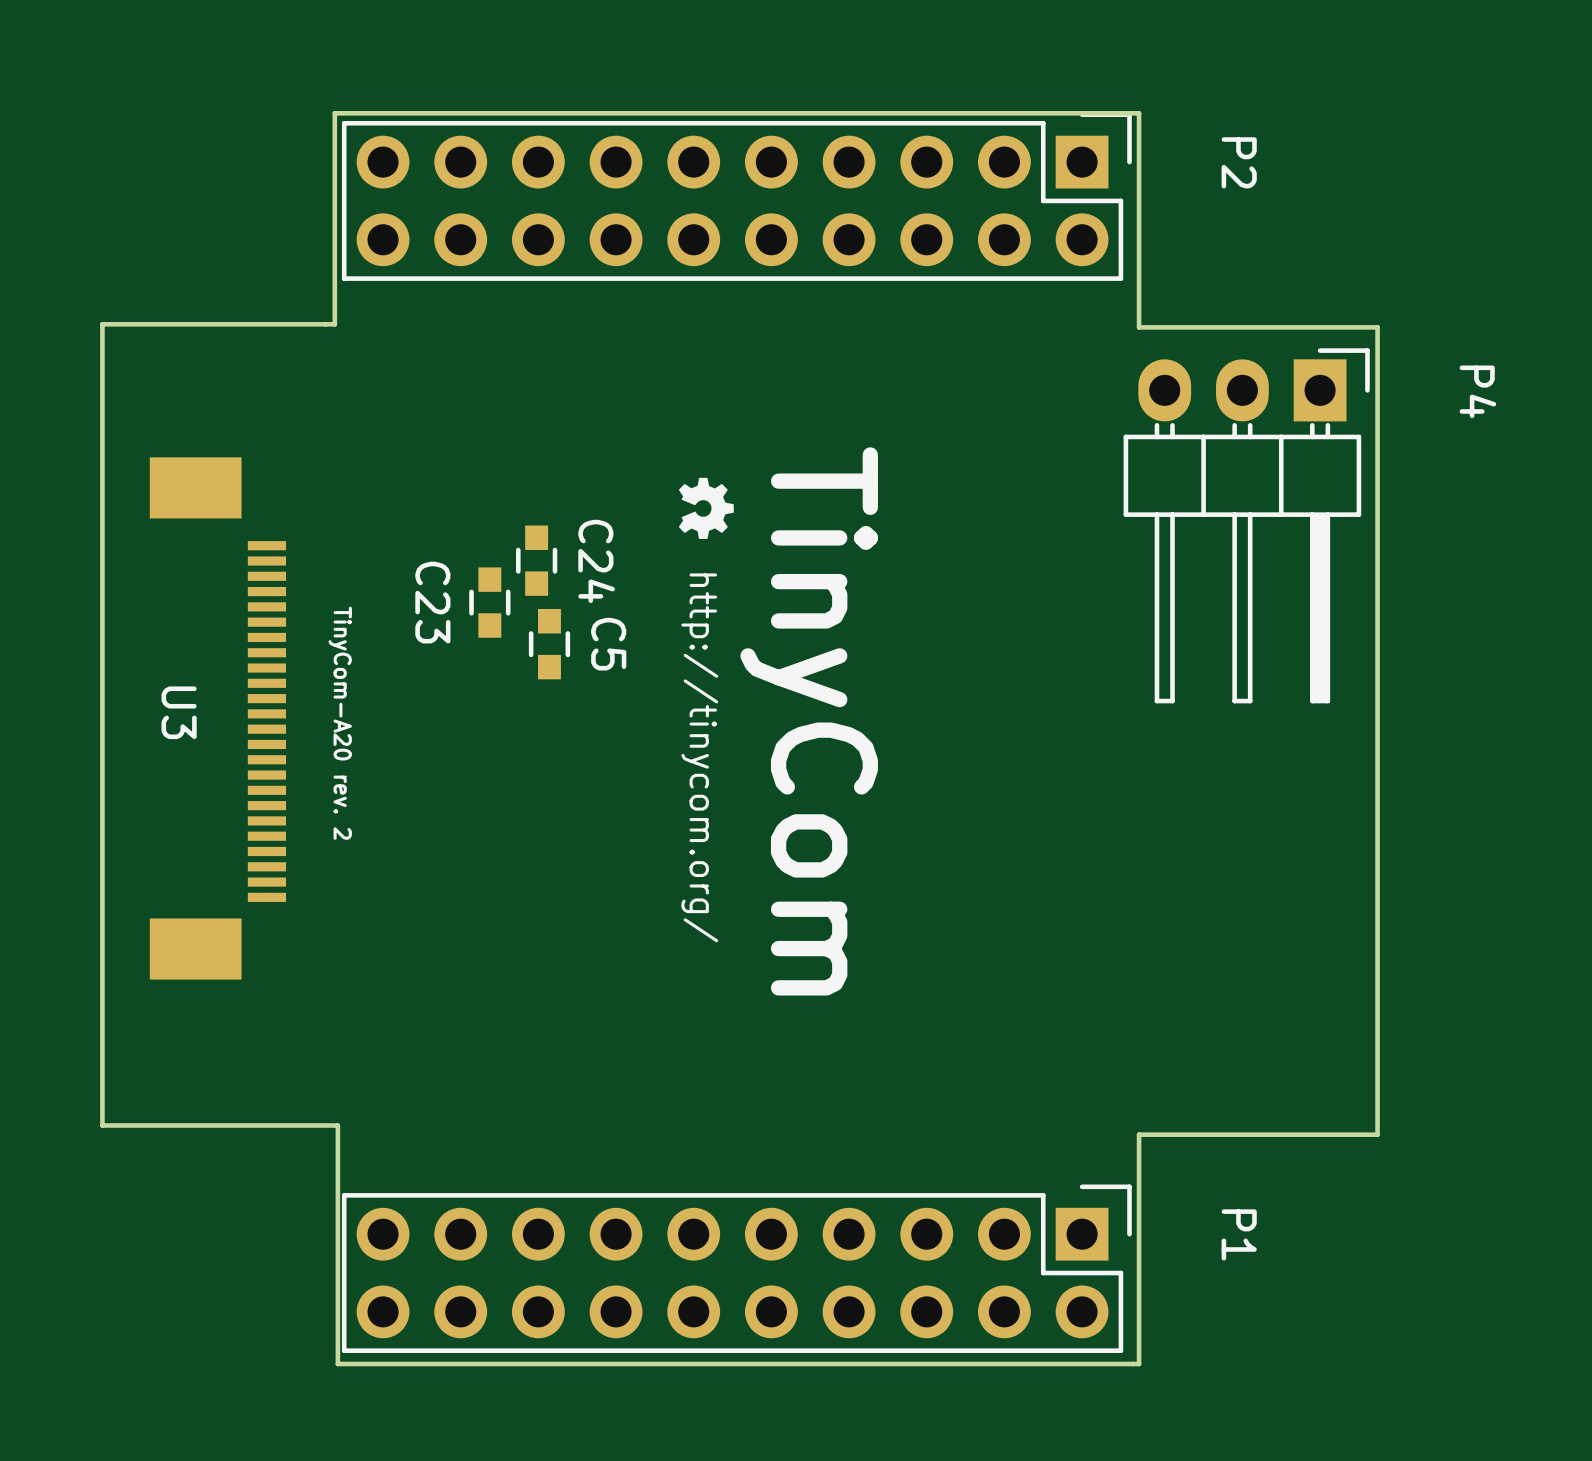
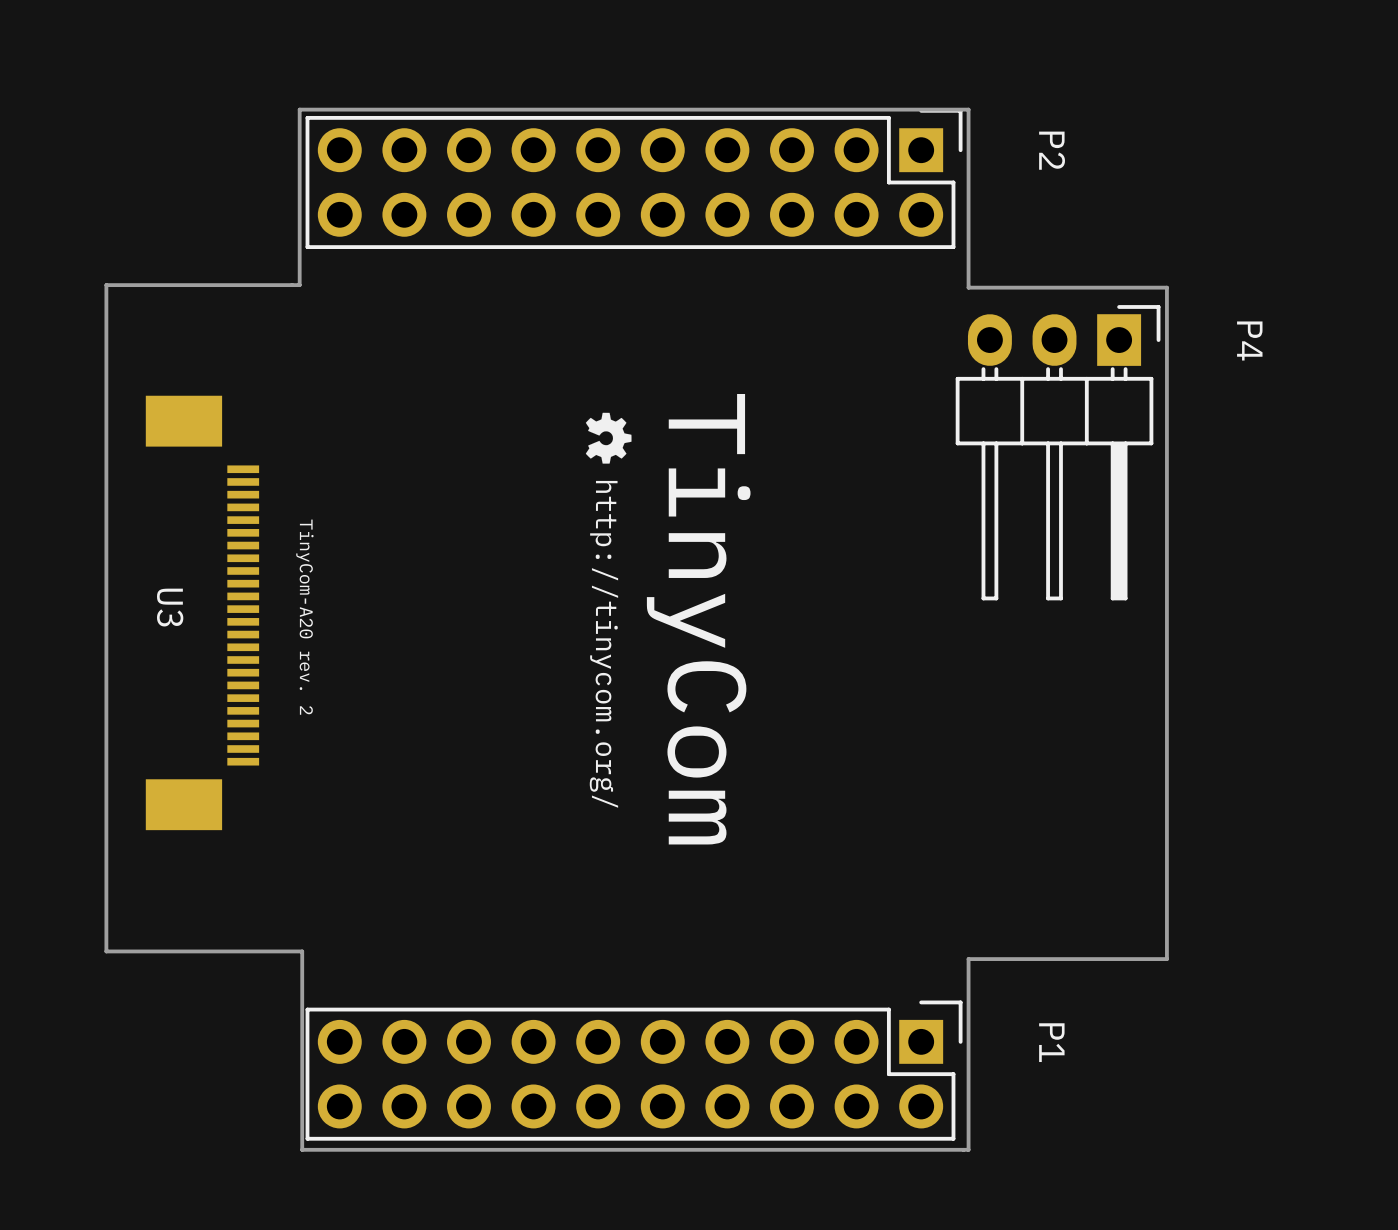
C24: (536, 560) -> none
C23: (489, 602) -> none
C5: (549, 644) -> none

